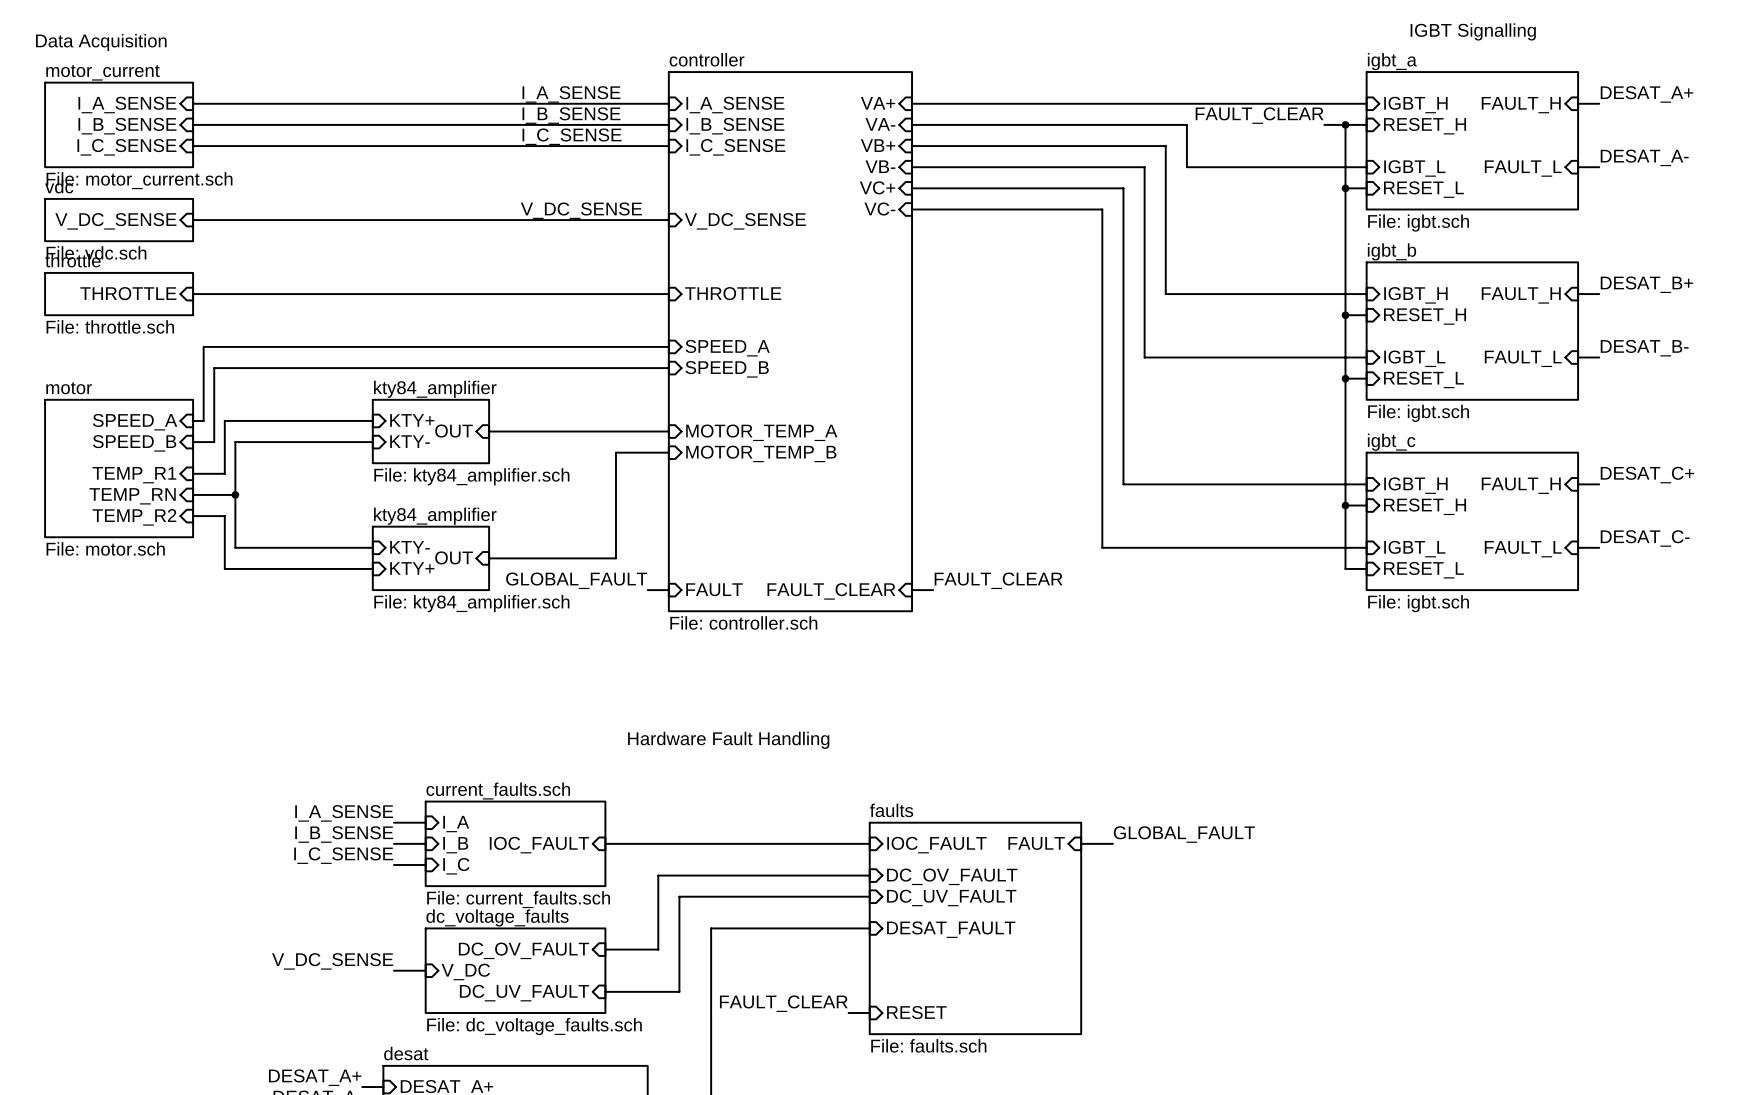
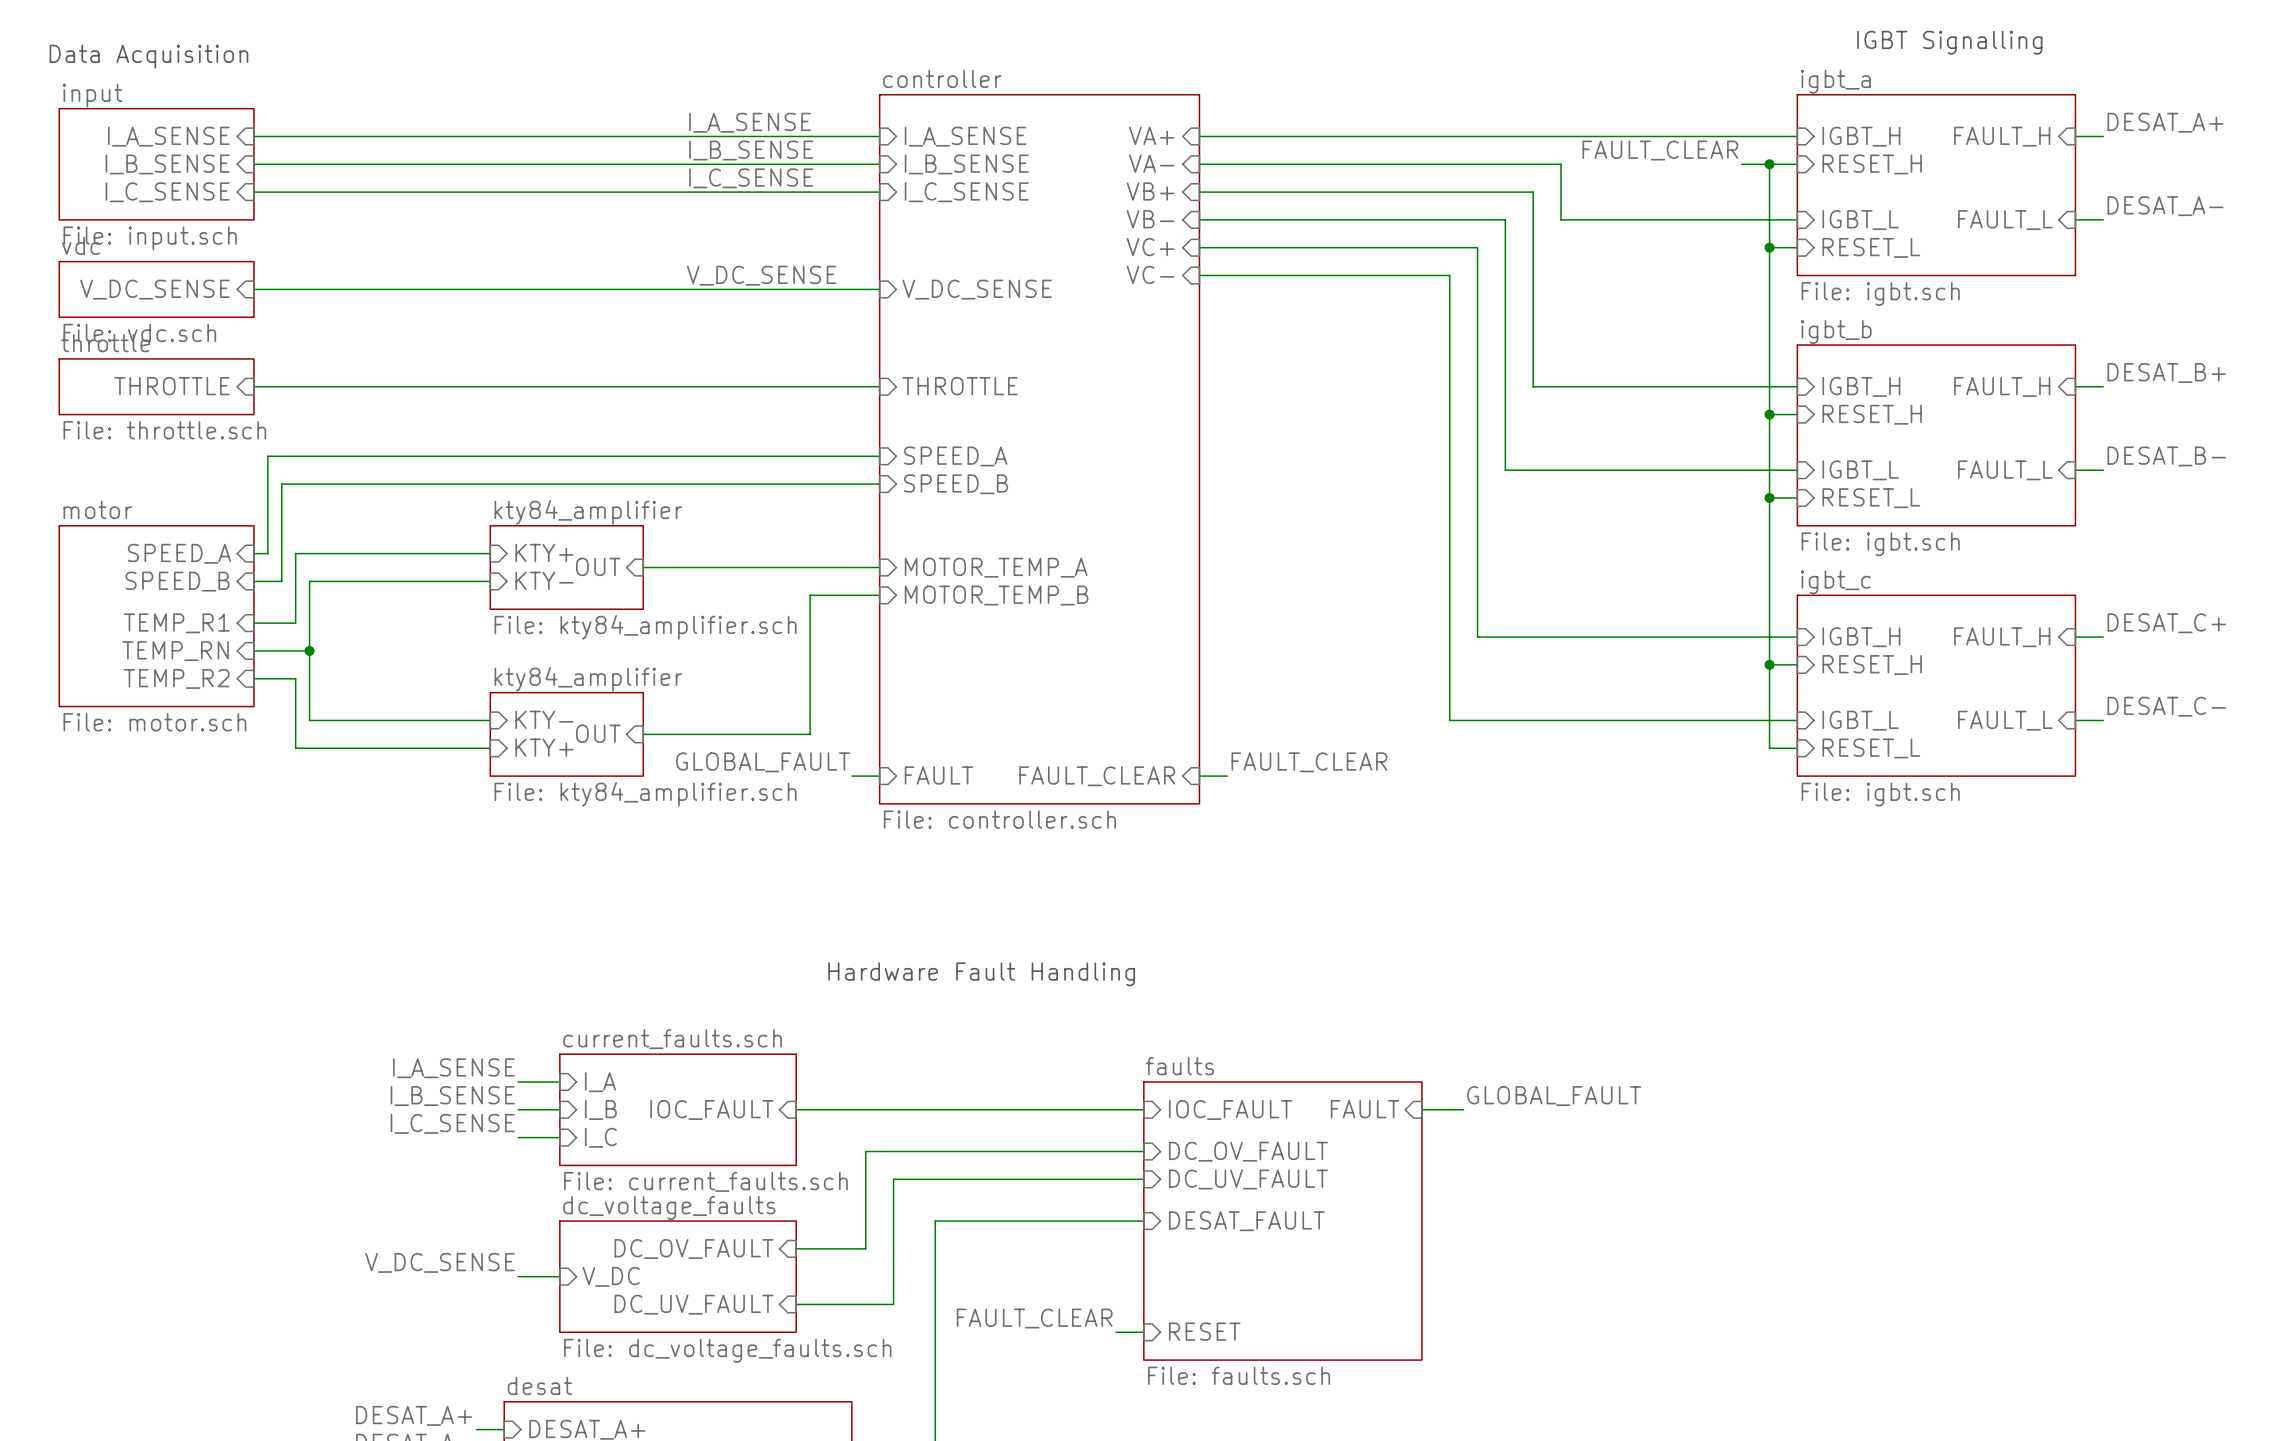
sheet motor_current name: motor_current (103, 72) -> input (92, 95)
sheet motor_current value: File: motor_current.sch (139, 180) -> File: input.sch (150, 238)

